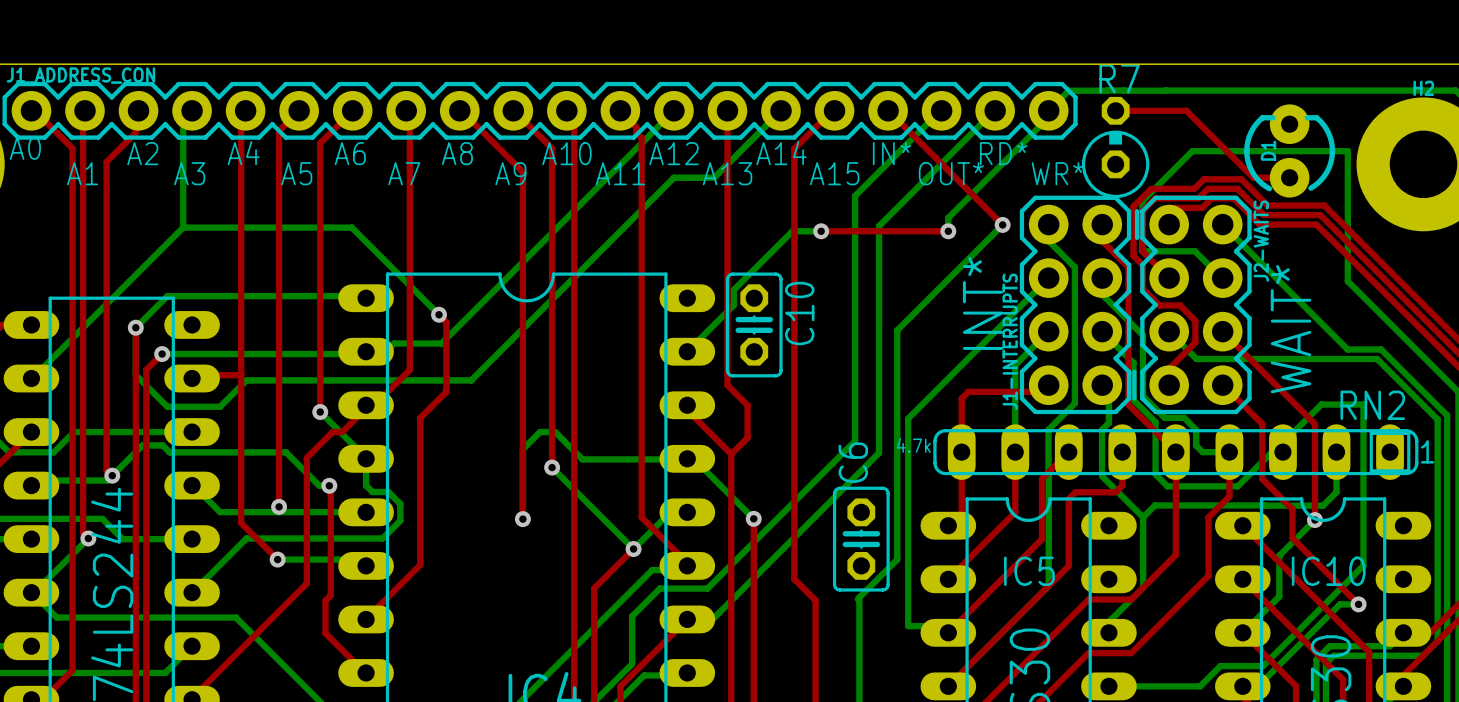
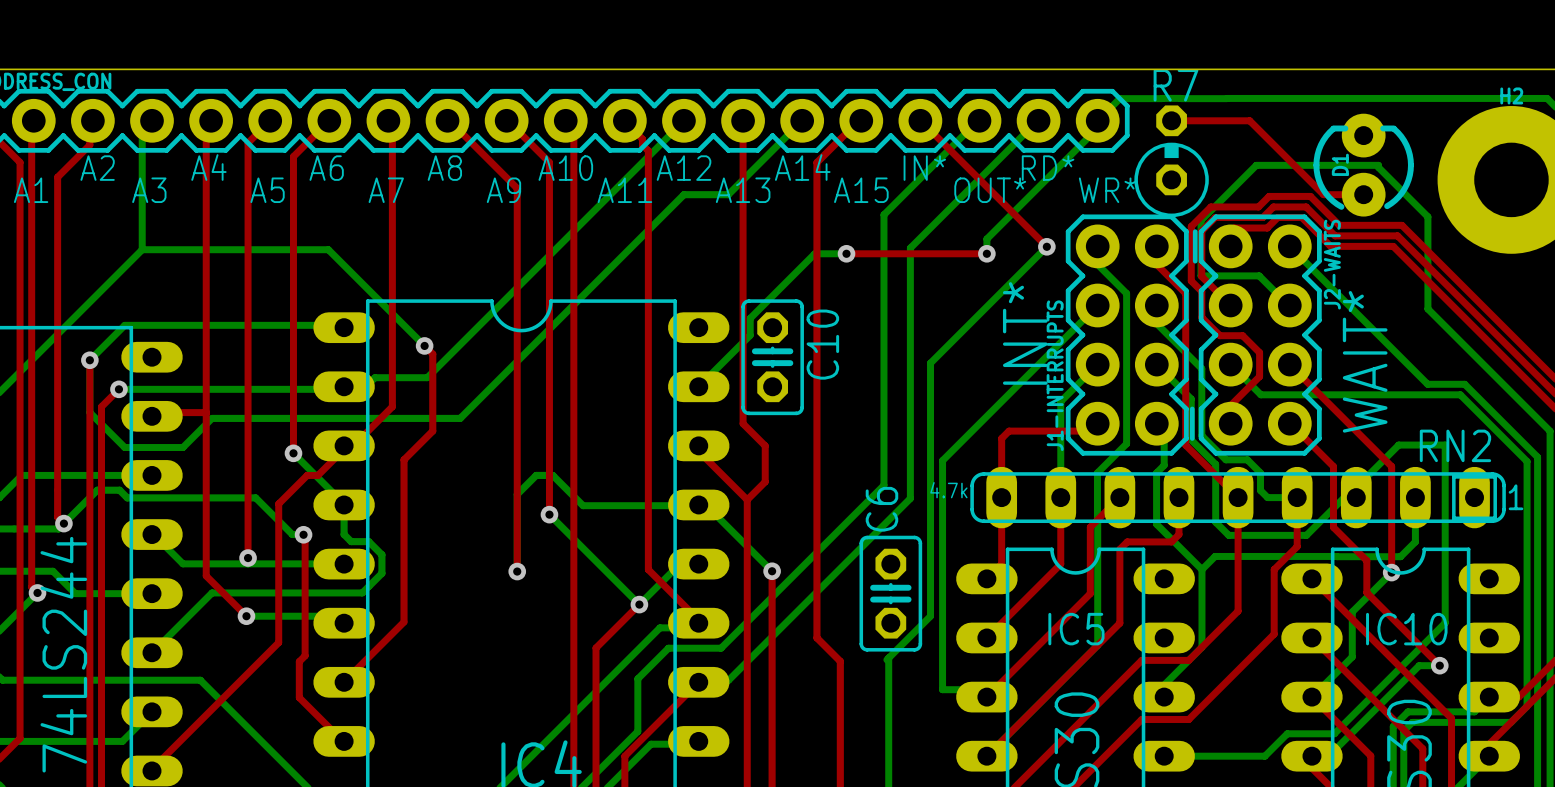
bottom track: (1303, 151) (1347, 151) (1347, 197) -> (1378, 165) (1427, 216)

